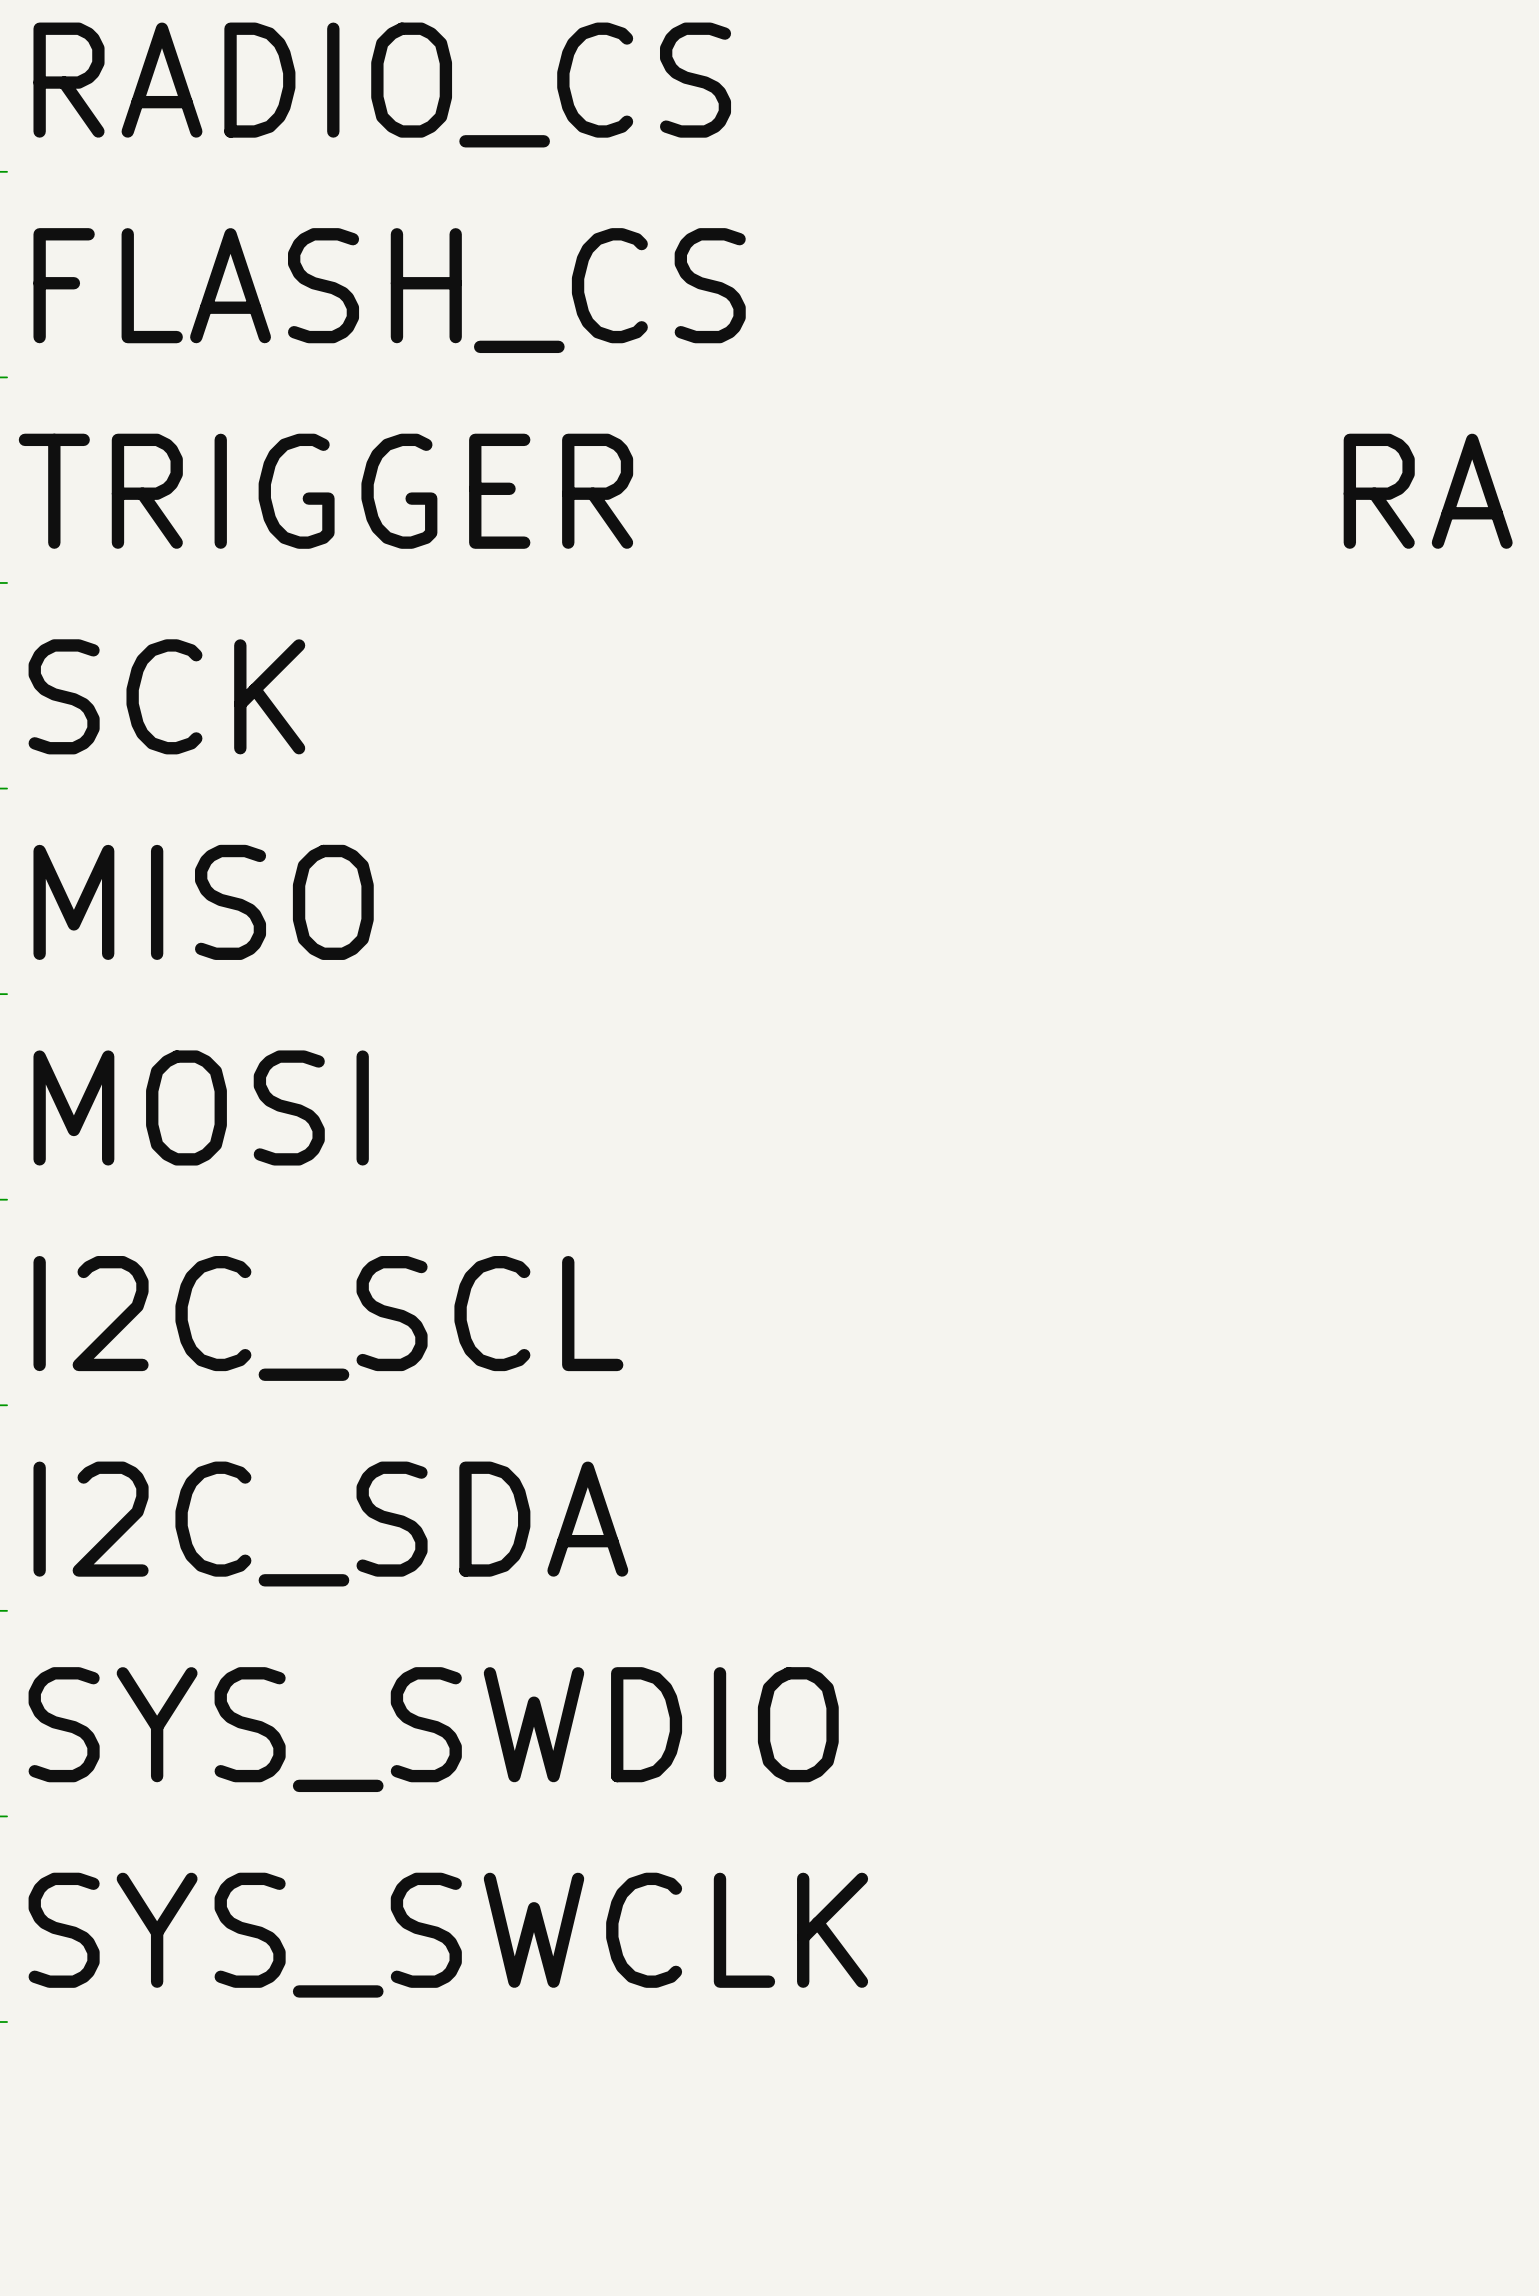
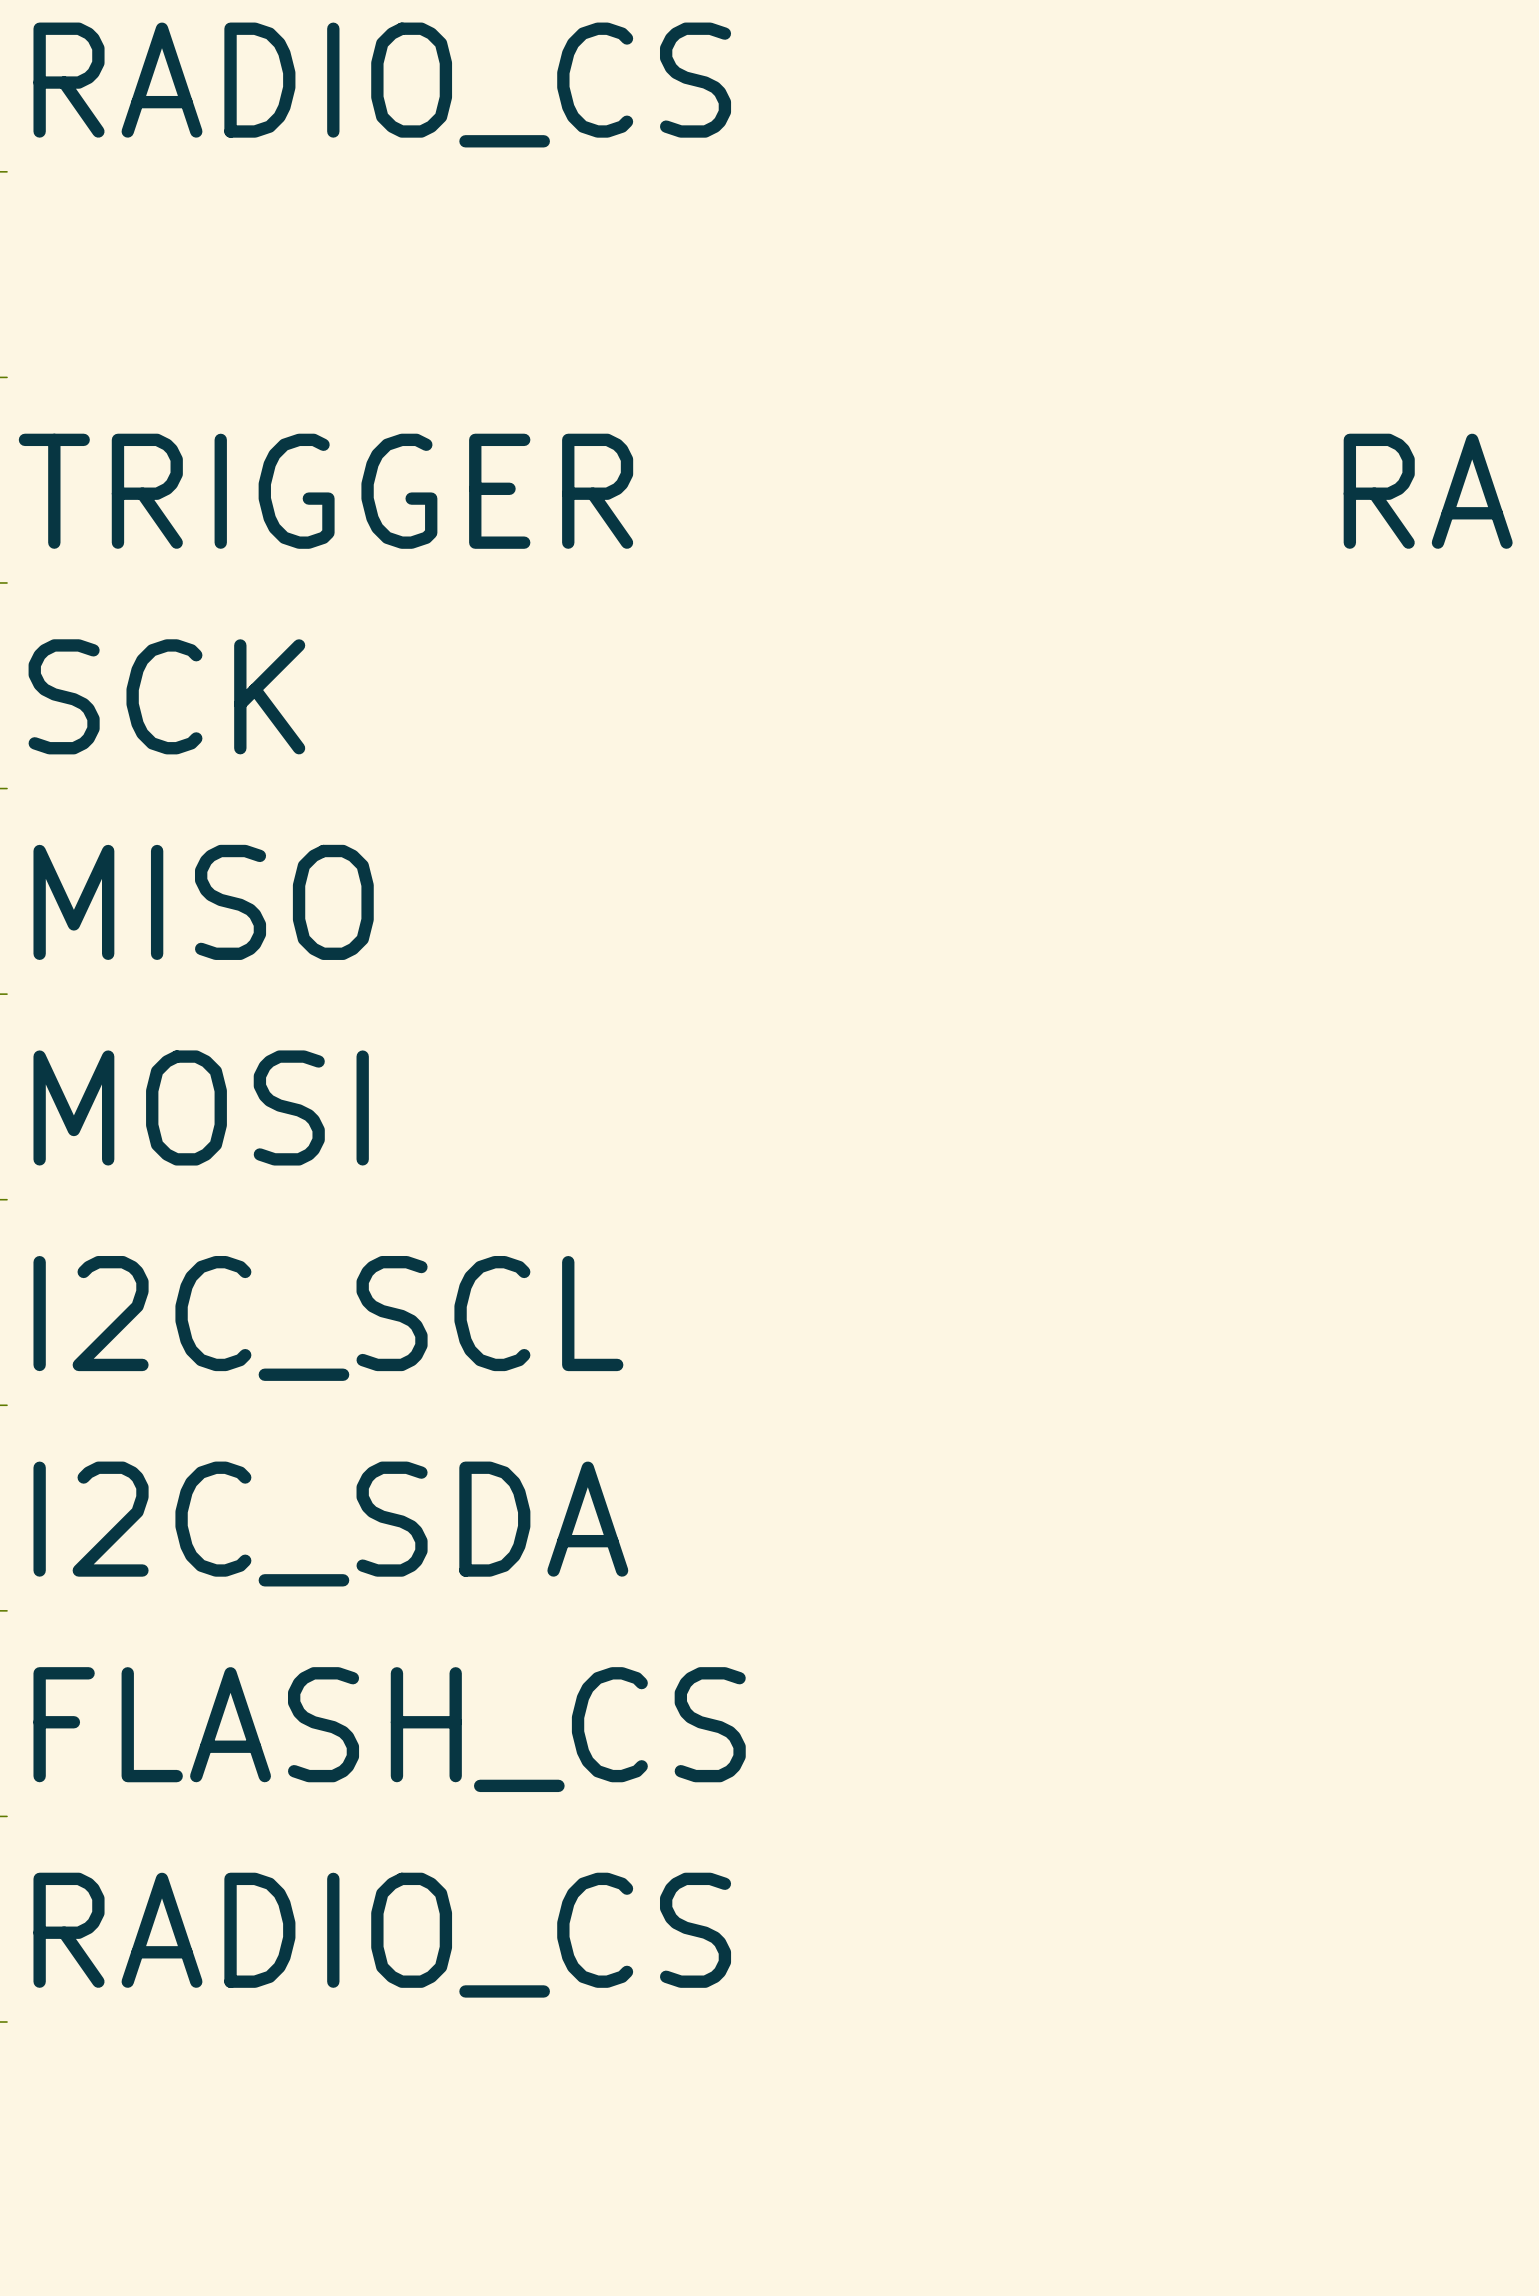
label: FLASH_CS (389, 290) -> none
label: SYS_SWDIO (433, 1729) -> FLASH_CS (389, 1729)
label: SYS_SWCLK (448, 1935) -> RADIO_CS (382, 1935)

